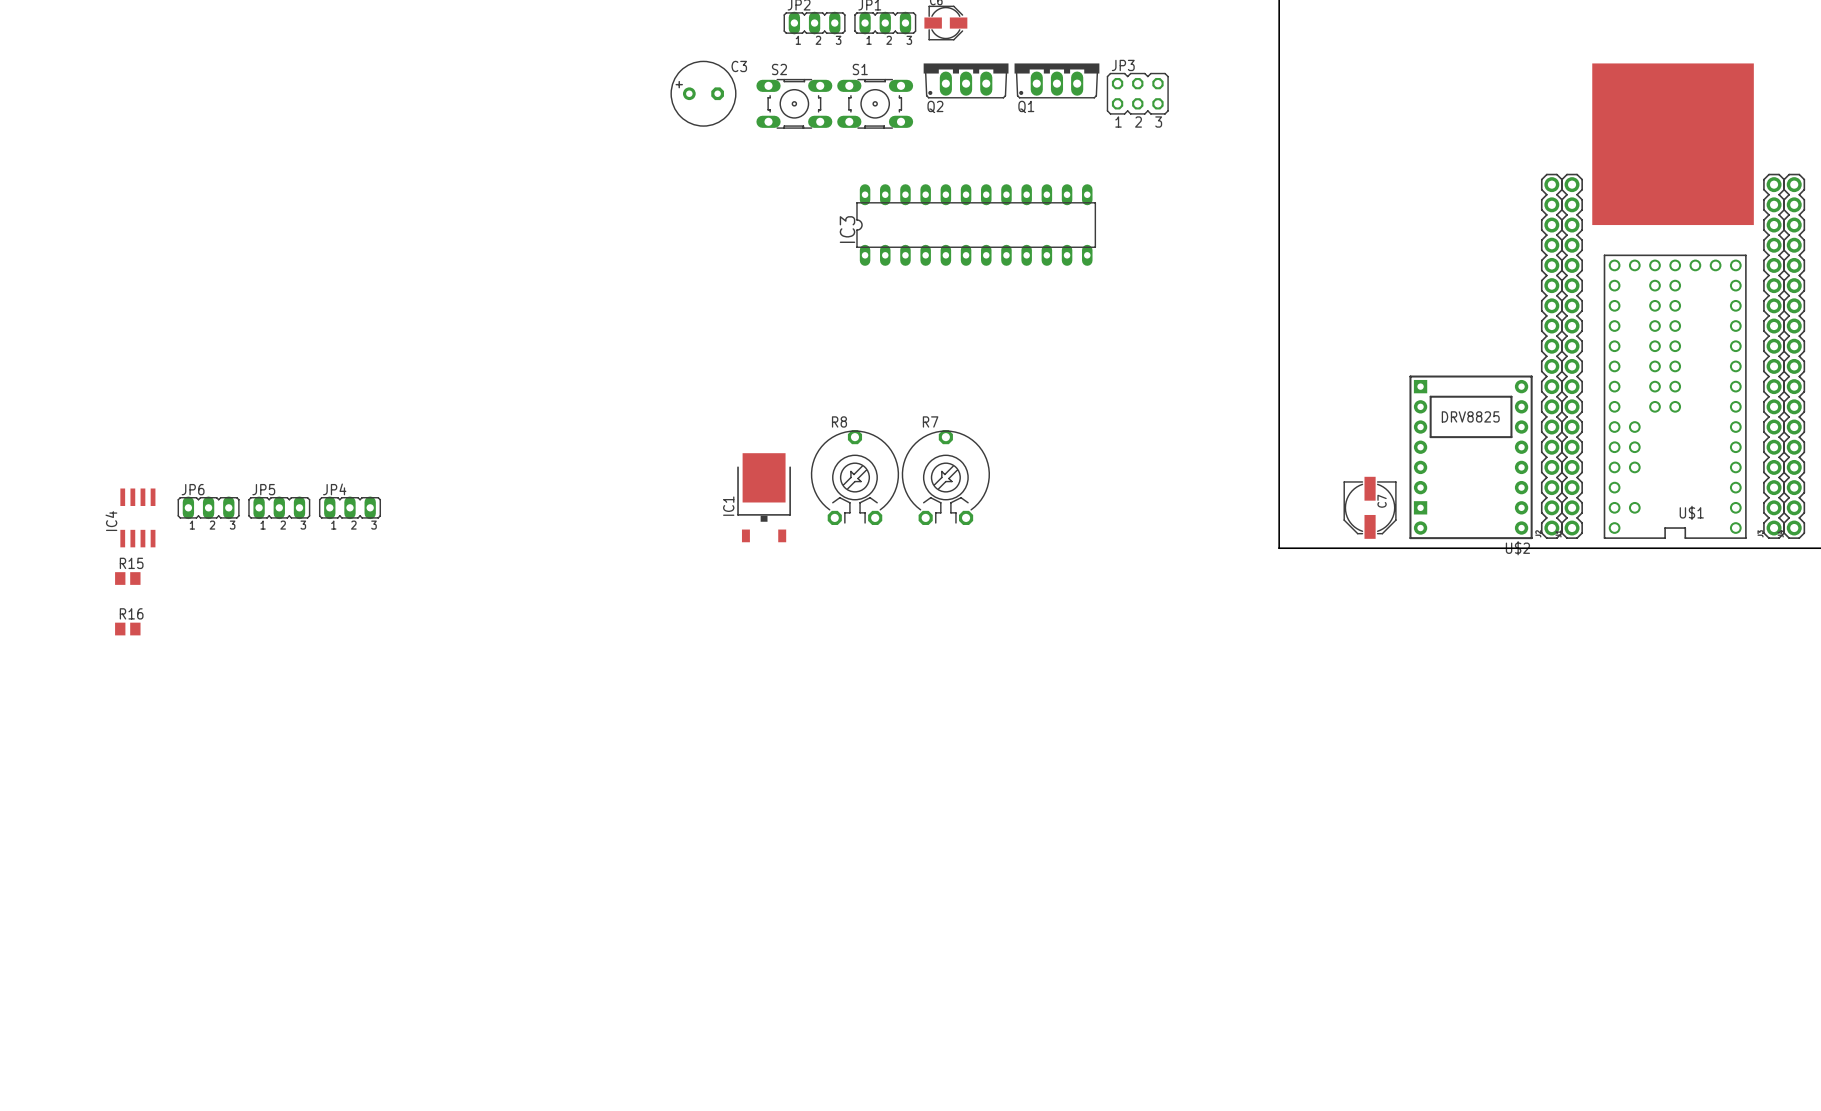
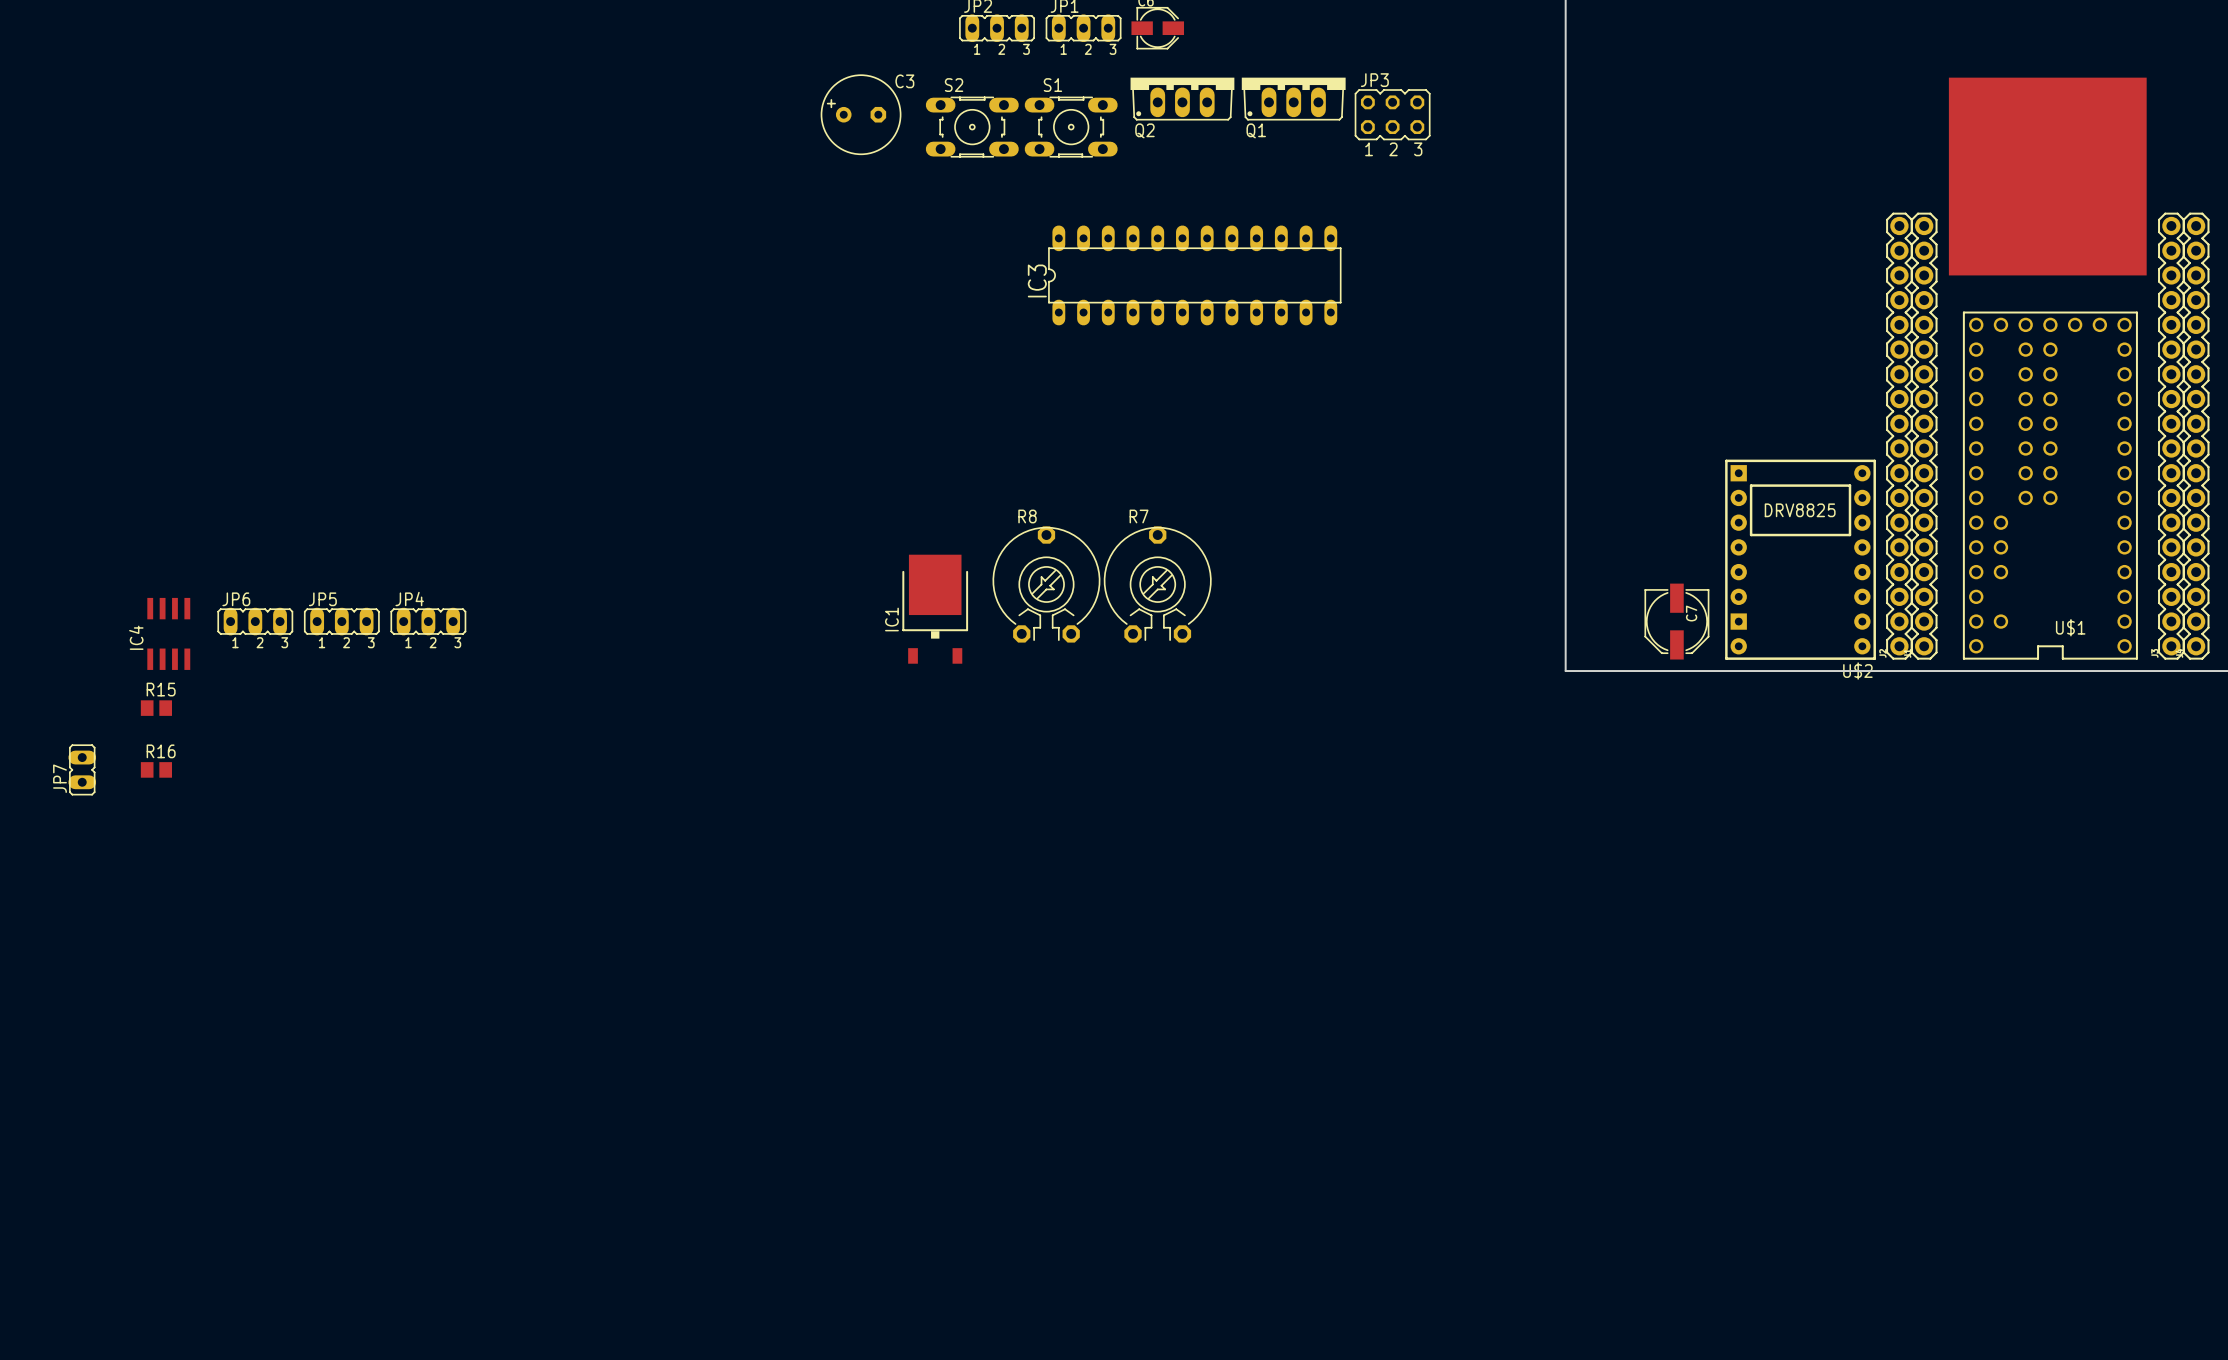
JP7: none -> (82, 769)

